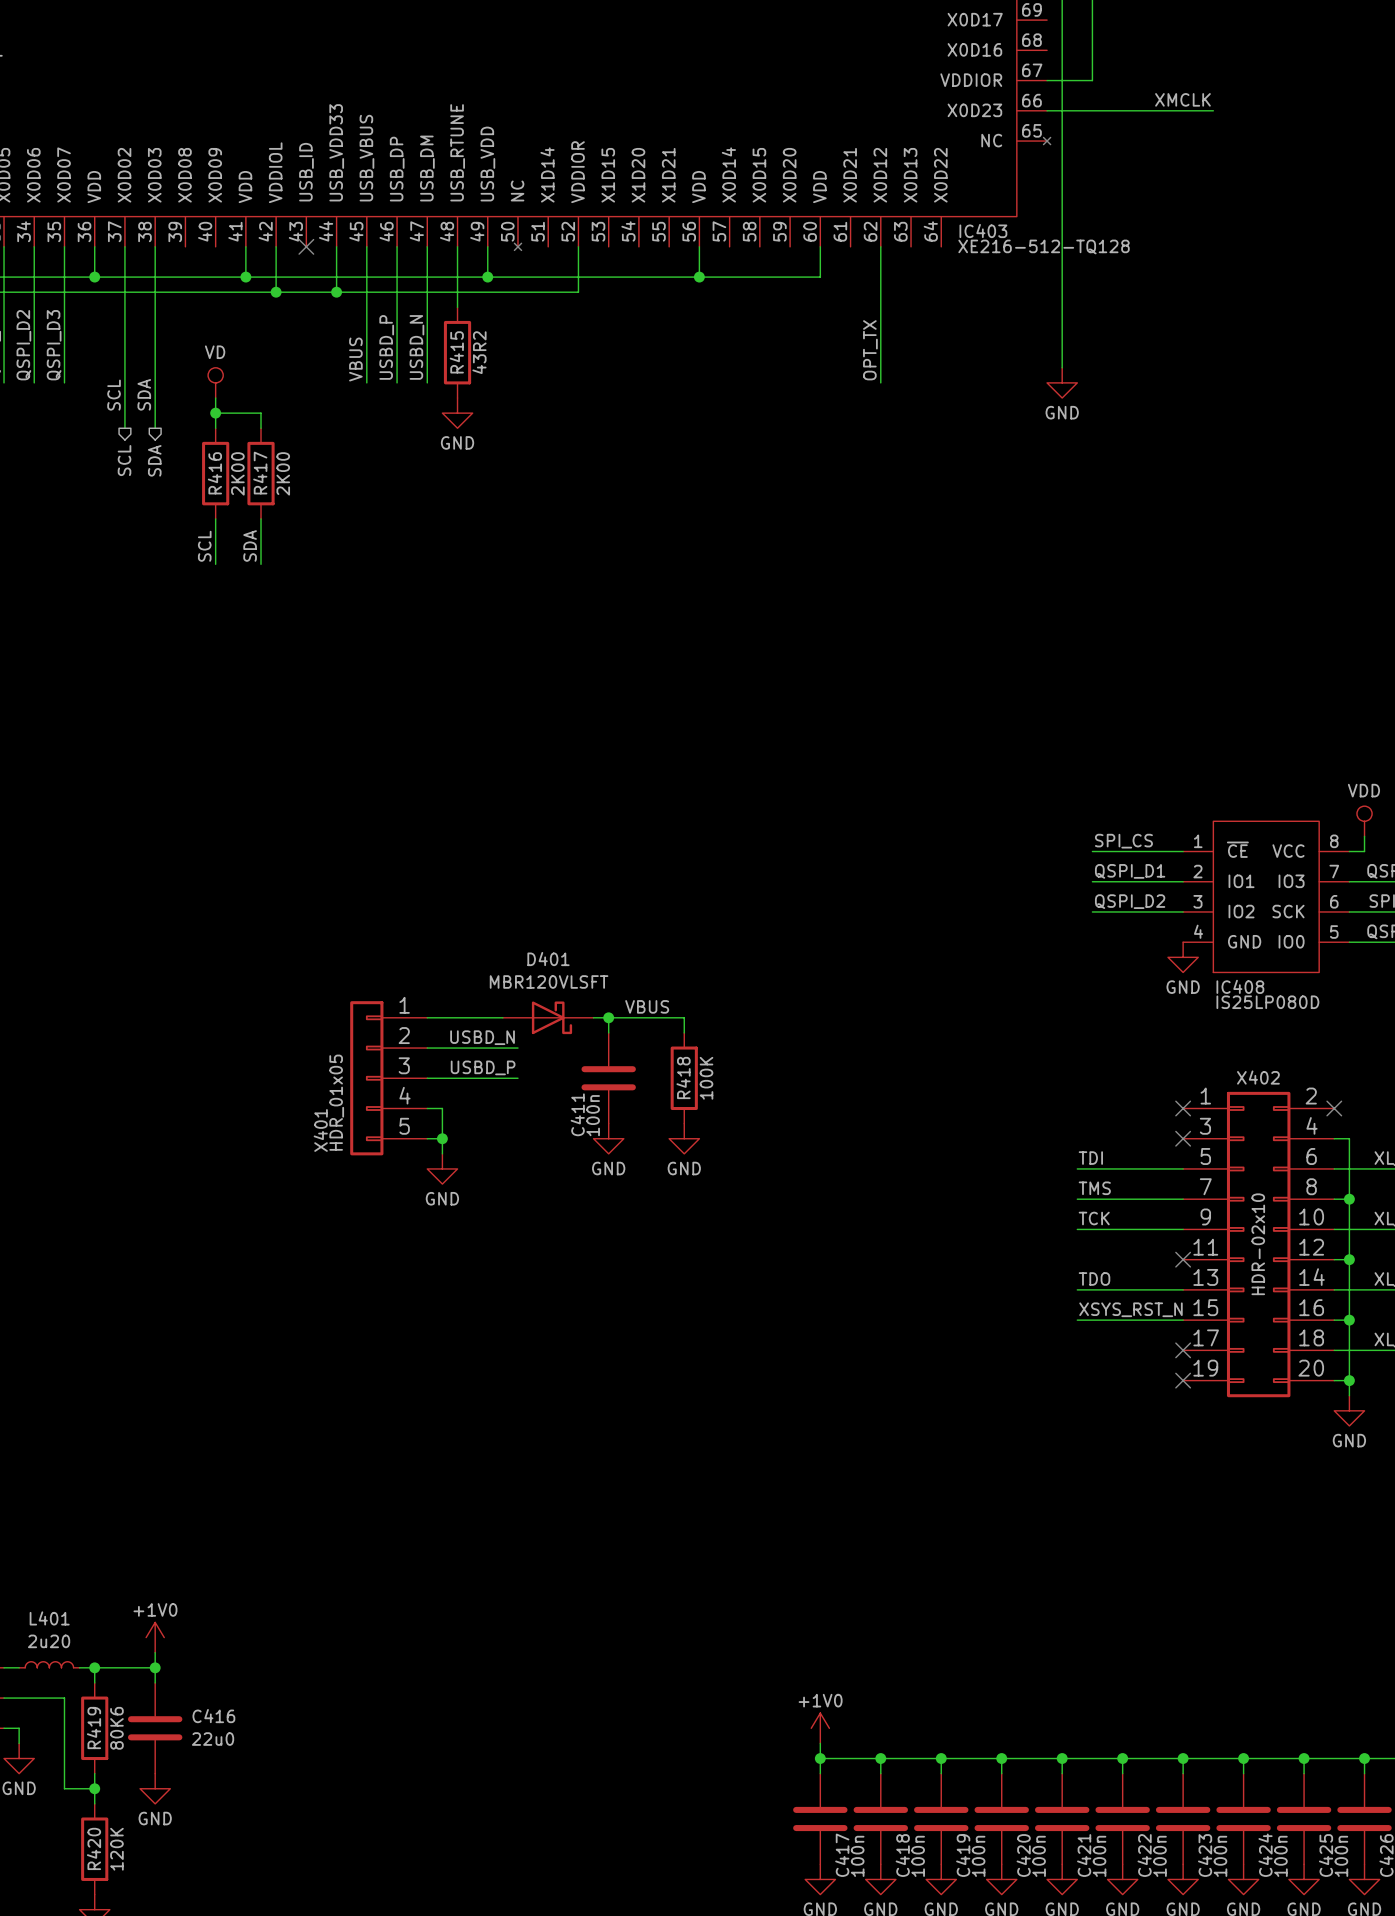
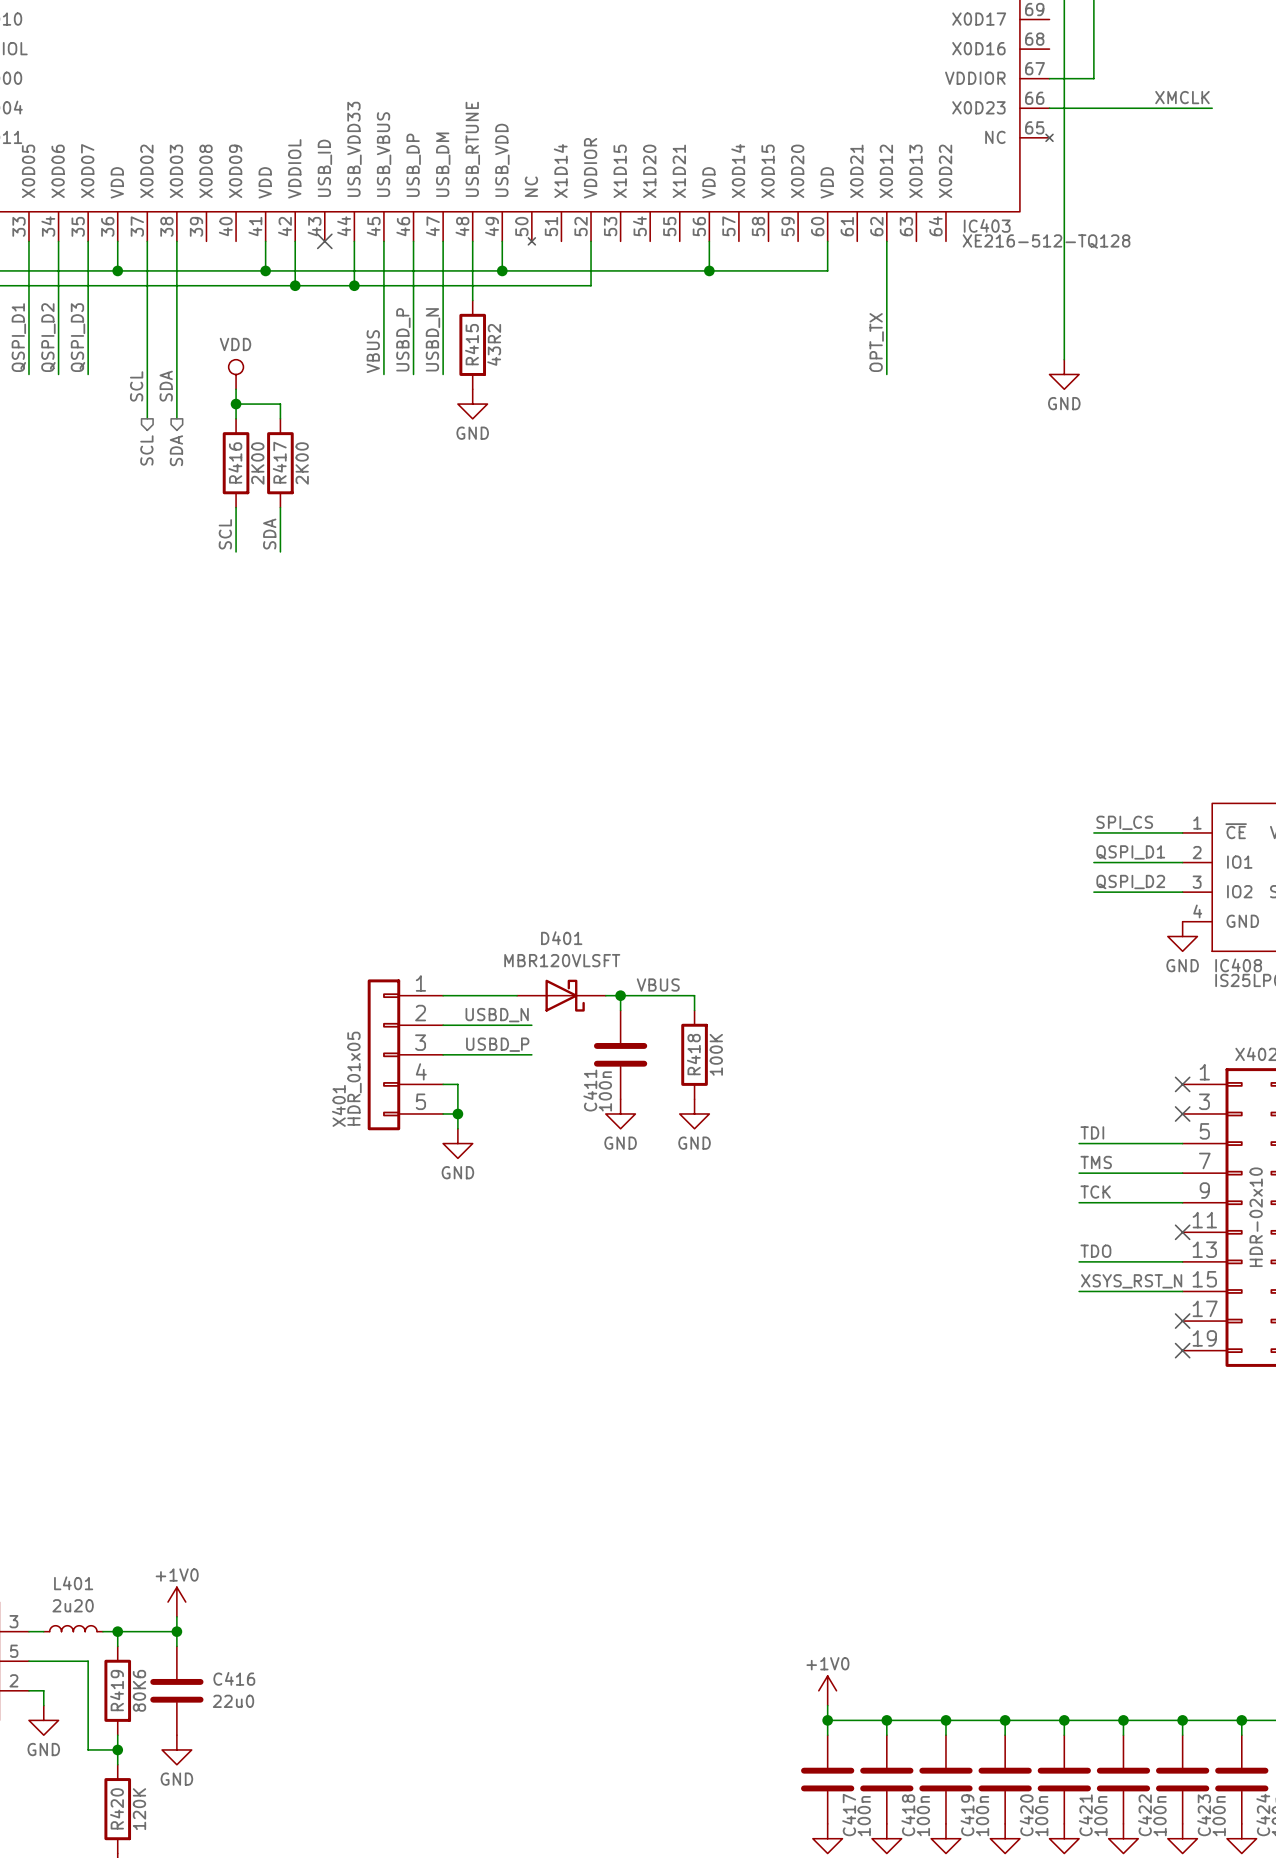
power symbol: VD (215, 382) -> VDD (236, 374)

